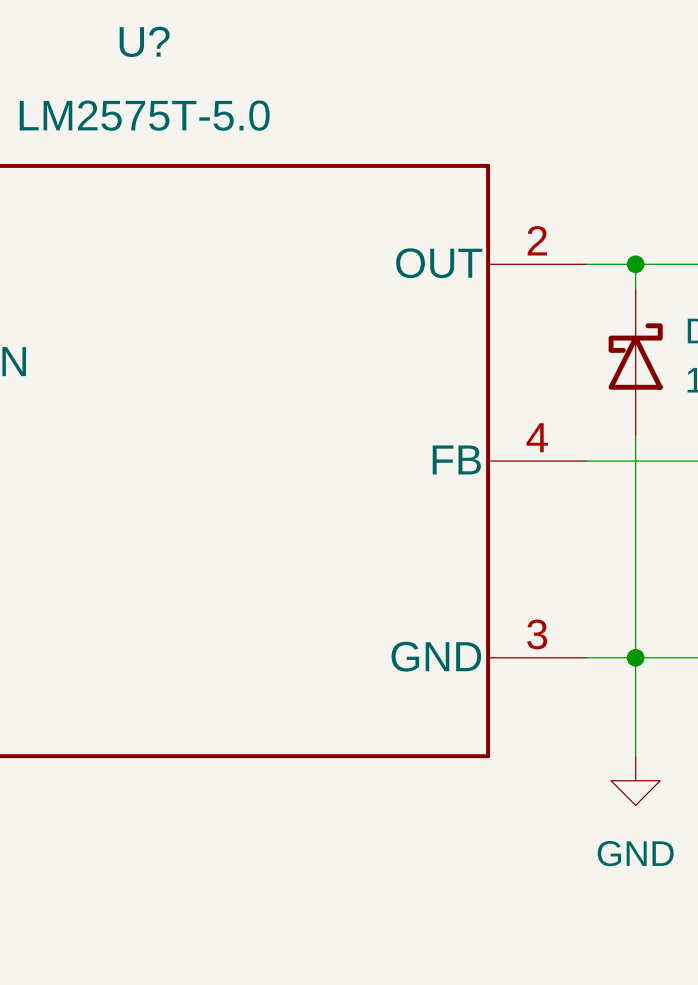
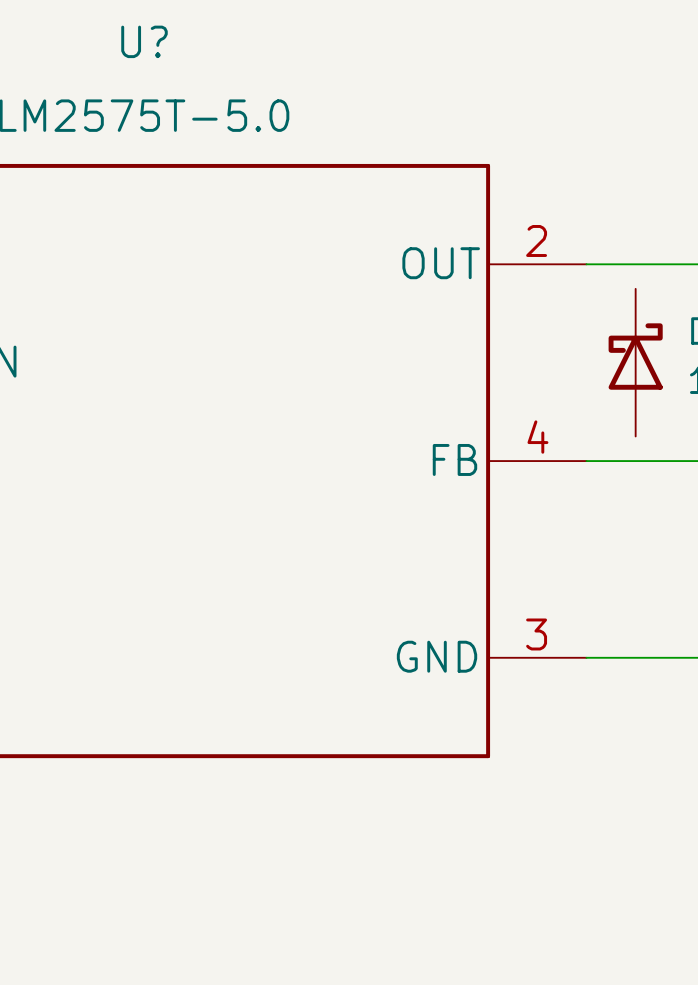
wire: (635, 264) (635, 288) -> none
junction: (635, 264) -> none
wire: (635, 436) (635, 756) -> none
junction: (635, 657) -> none
power symbol: GND (635, 780) -> none

